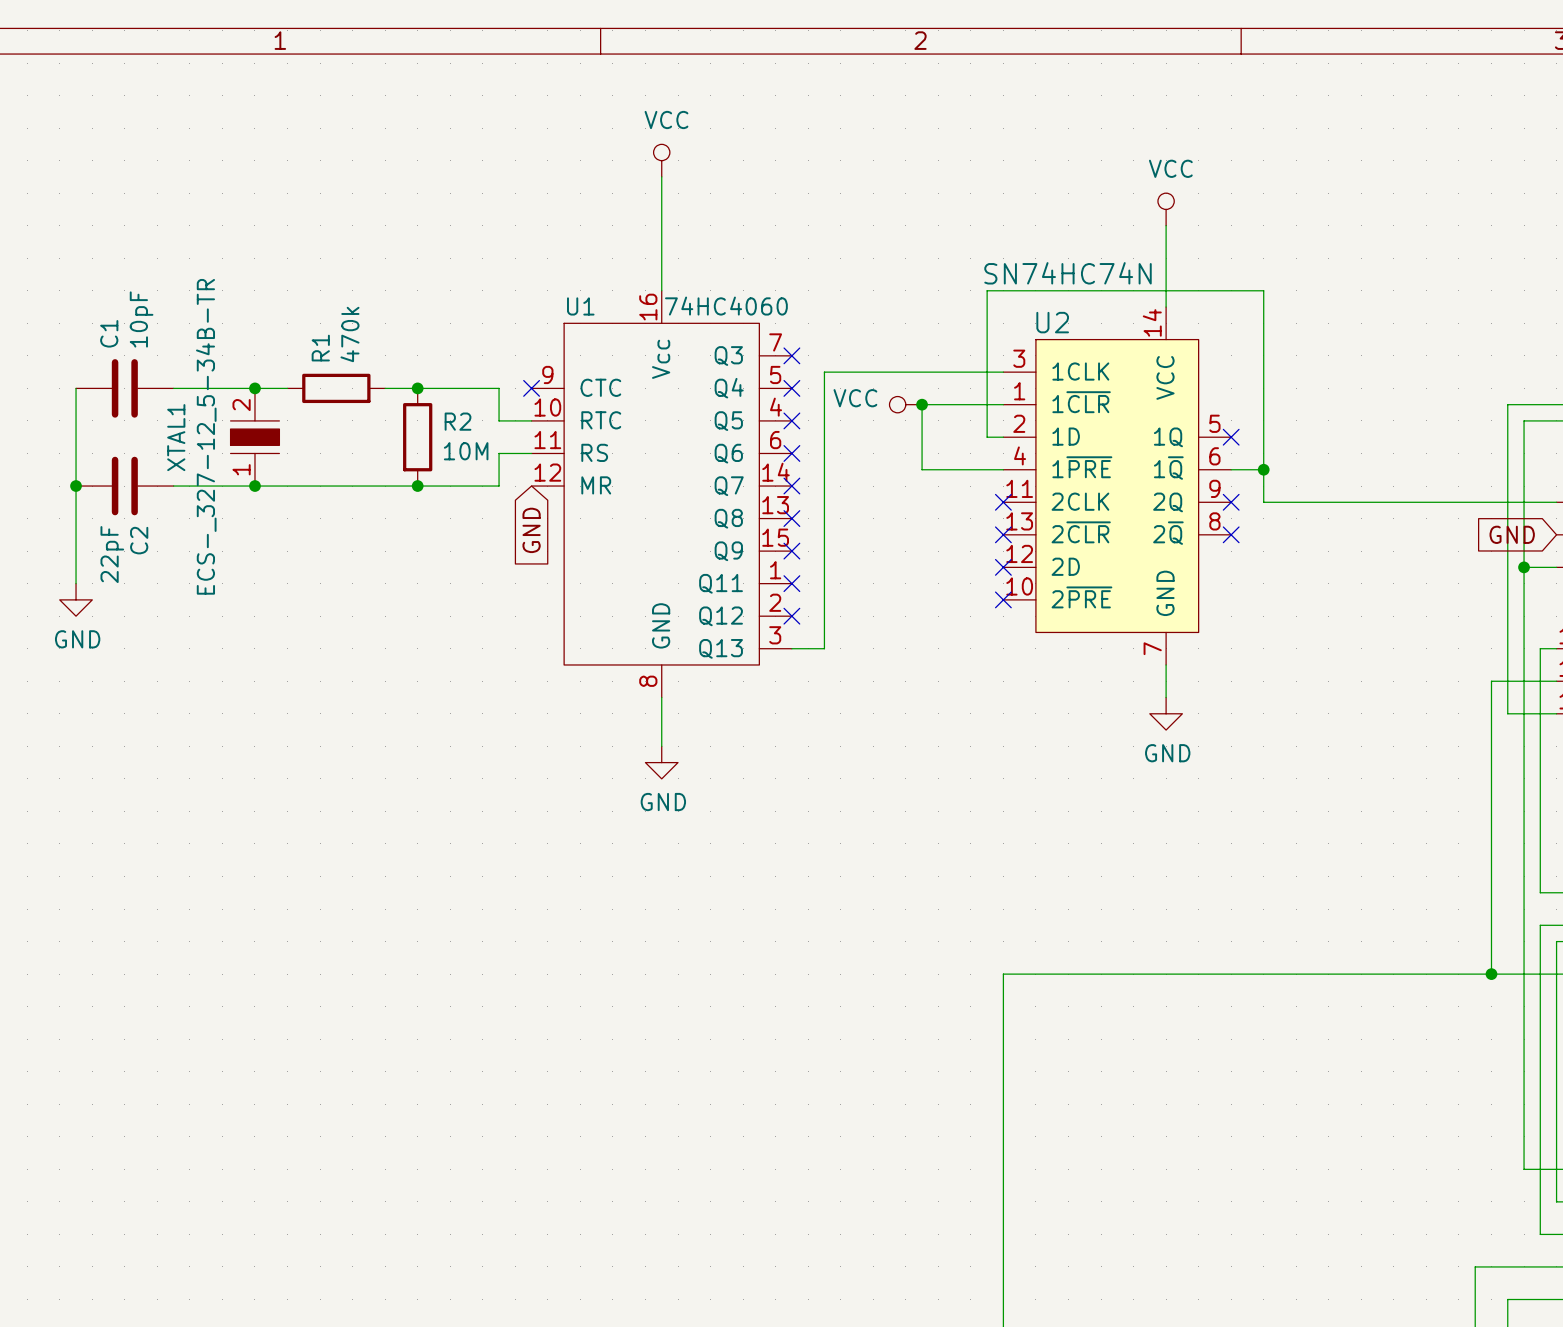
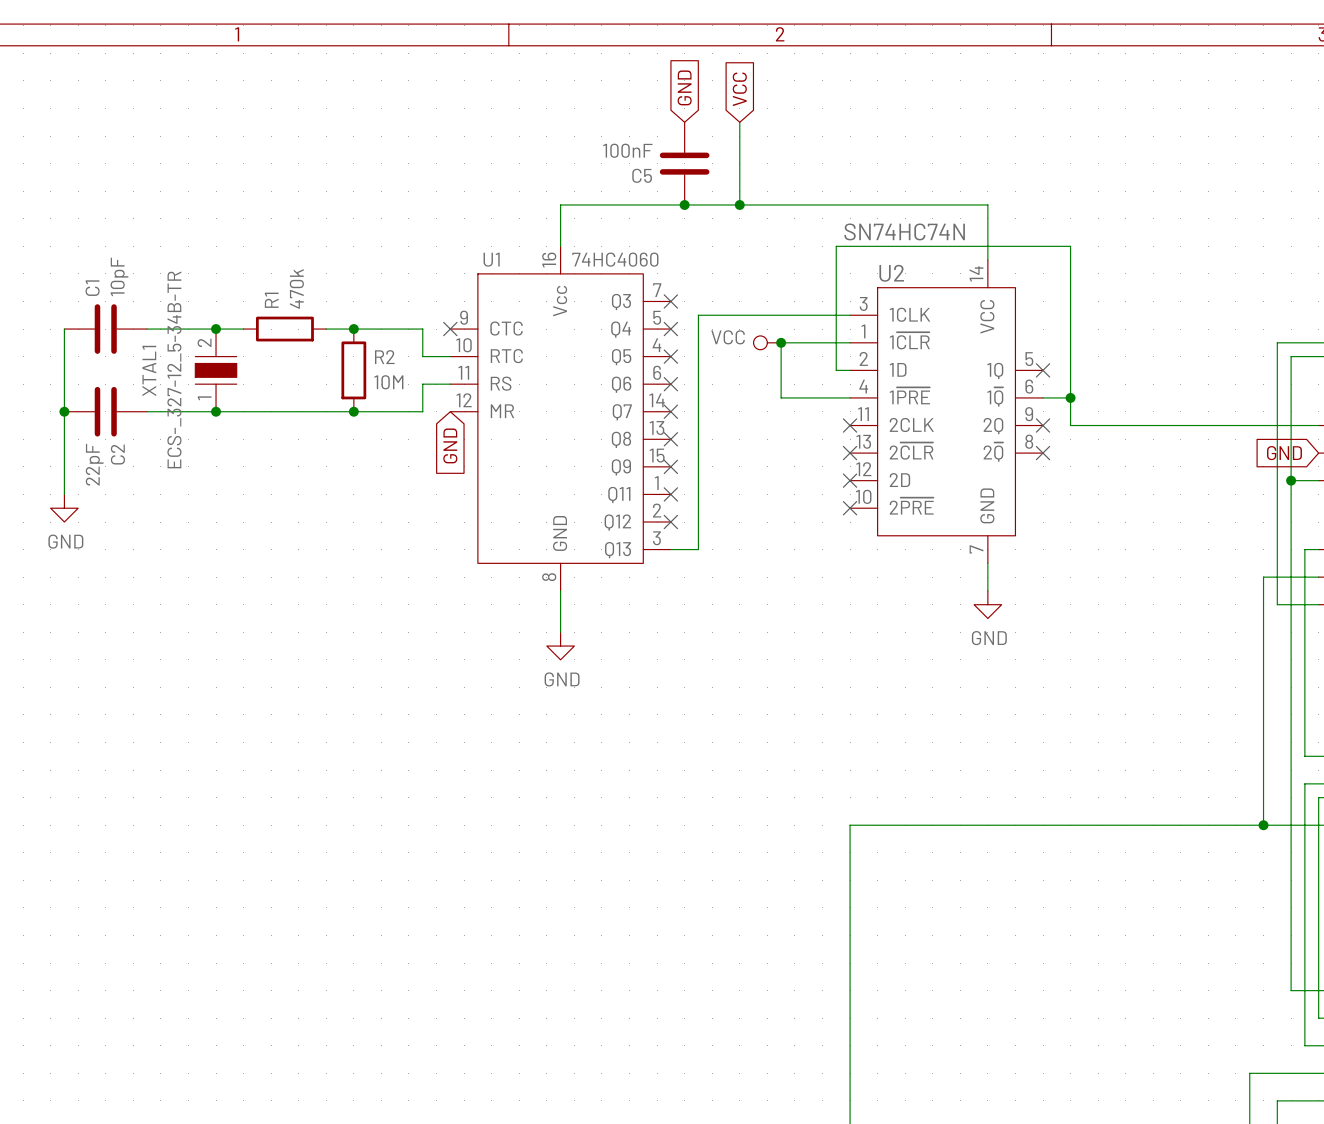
global label: none -> GND (684, 87)
global label: none -> VCC (739, 89)
wire: none -> (739, 122) (739, 204)
power symbol: VCC (661, 160) -> none
wire: (661, 176) (661, 241) -> none
C5: none -> 100nF (684, 163)
power symbol: VCC (1166, 209) -> none
wire: (1166, 225) (1166, 241) -> (560, 204) (987, 204)
junction: none -> (684, 204)
junction: none -> (739, 204)

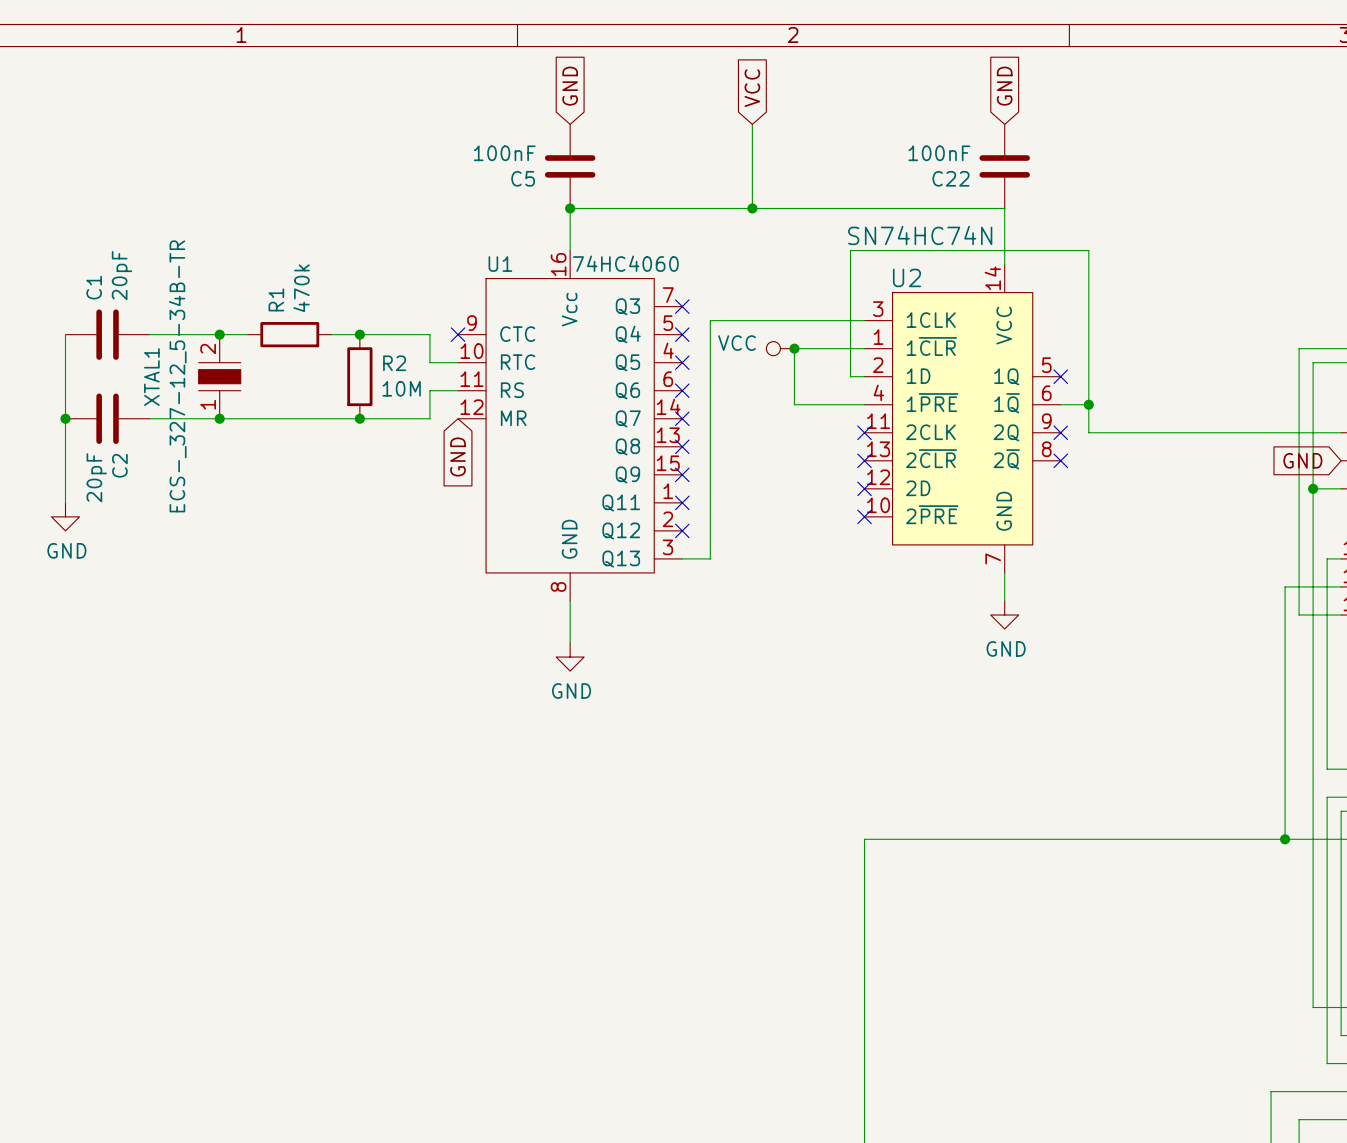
global label position: GND (684, 87) -> GND (570, 86)
global label: none -> GND (1004, 86)
C5 position: (684, 163) -> (570, 166)
C22: none -> 100nF (1004, 166)
junction: none -> (570, 208)
junction: (684, 204) -> none
C1 value: 10pF (119, 276) -> 20pF (121, 275)
C2 value: 22pF (94, 464) -> 20pF (96, 477)

